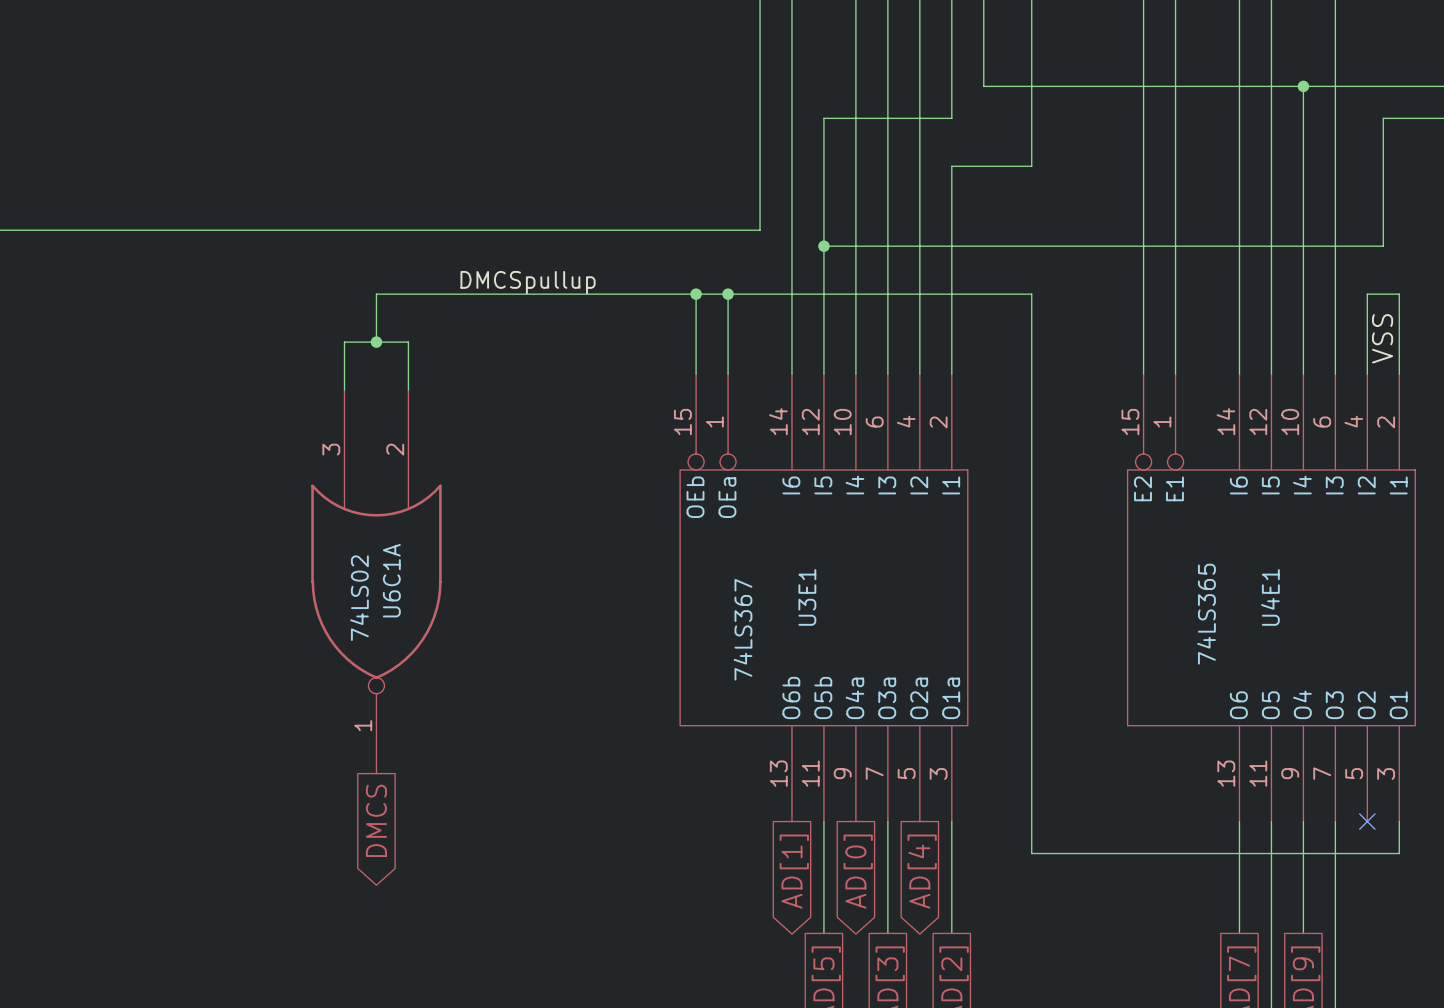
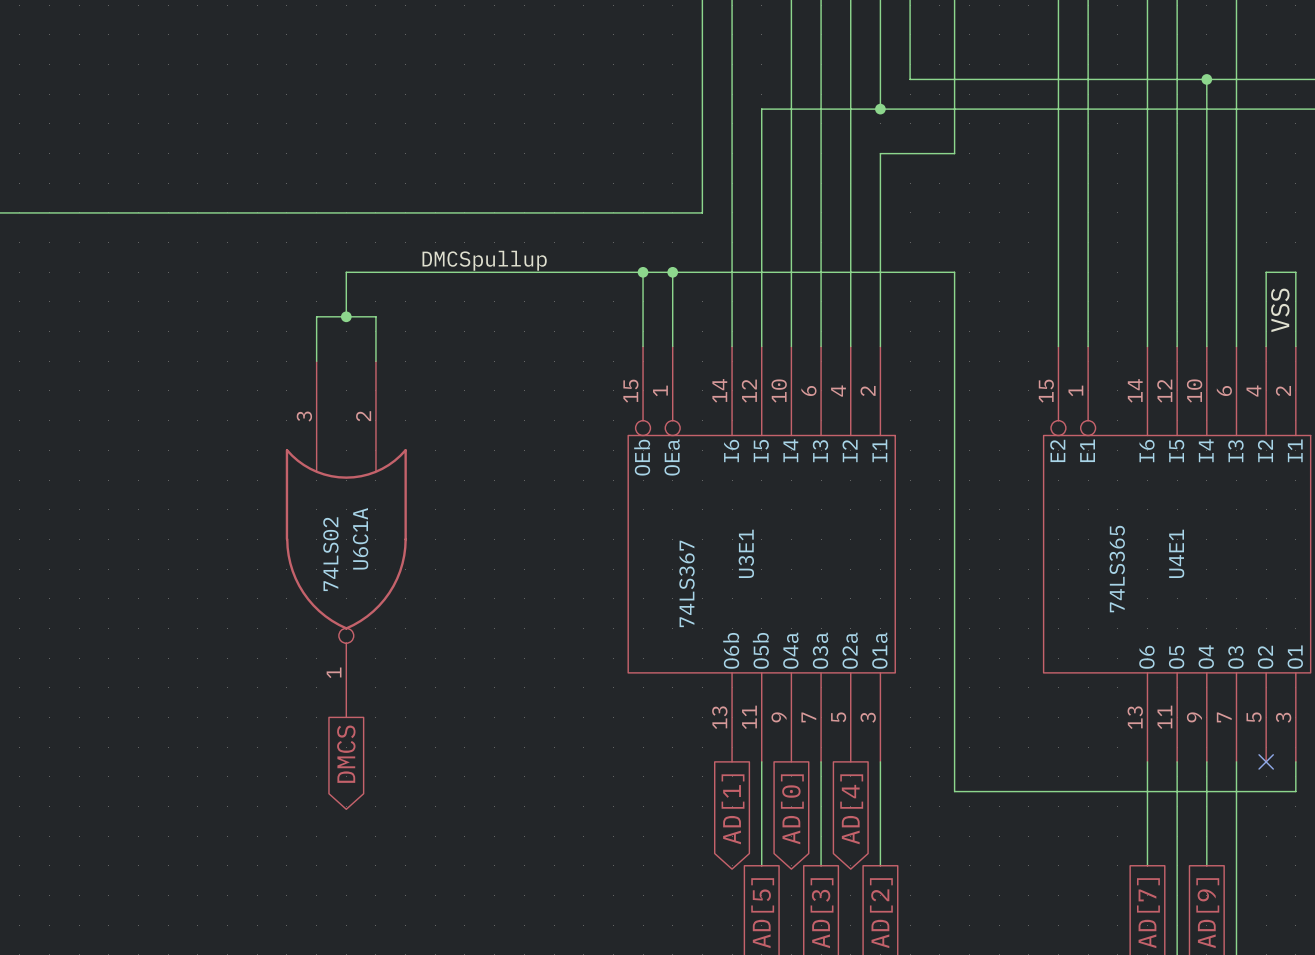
junction: none -> (880, 109)
wire: (1383, 118) (1383, 246) (823, 246) -> (1280, 109) (880, 109)
junction: (823, 246) -> none

